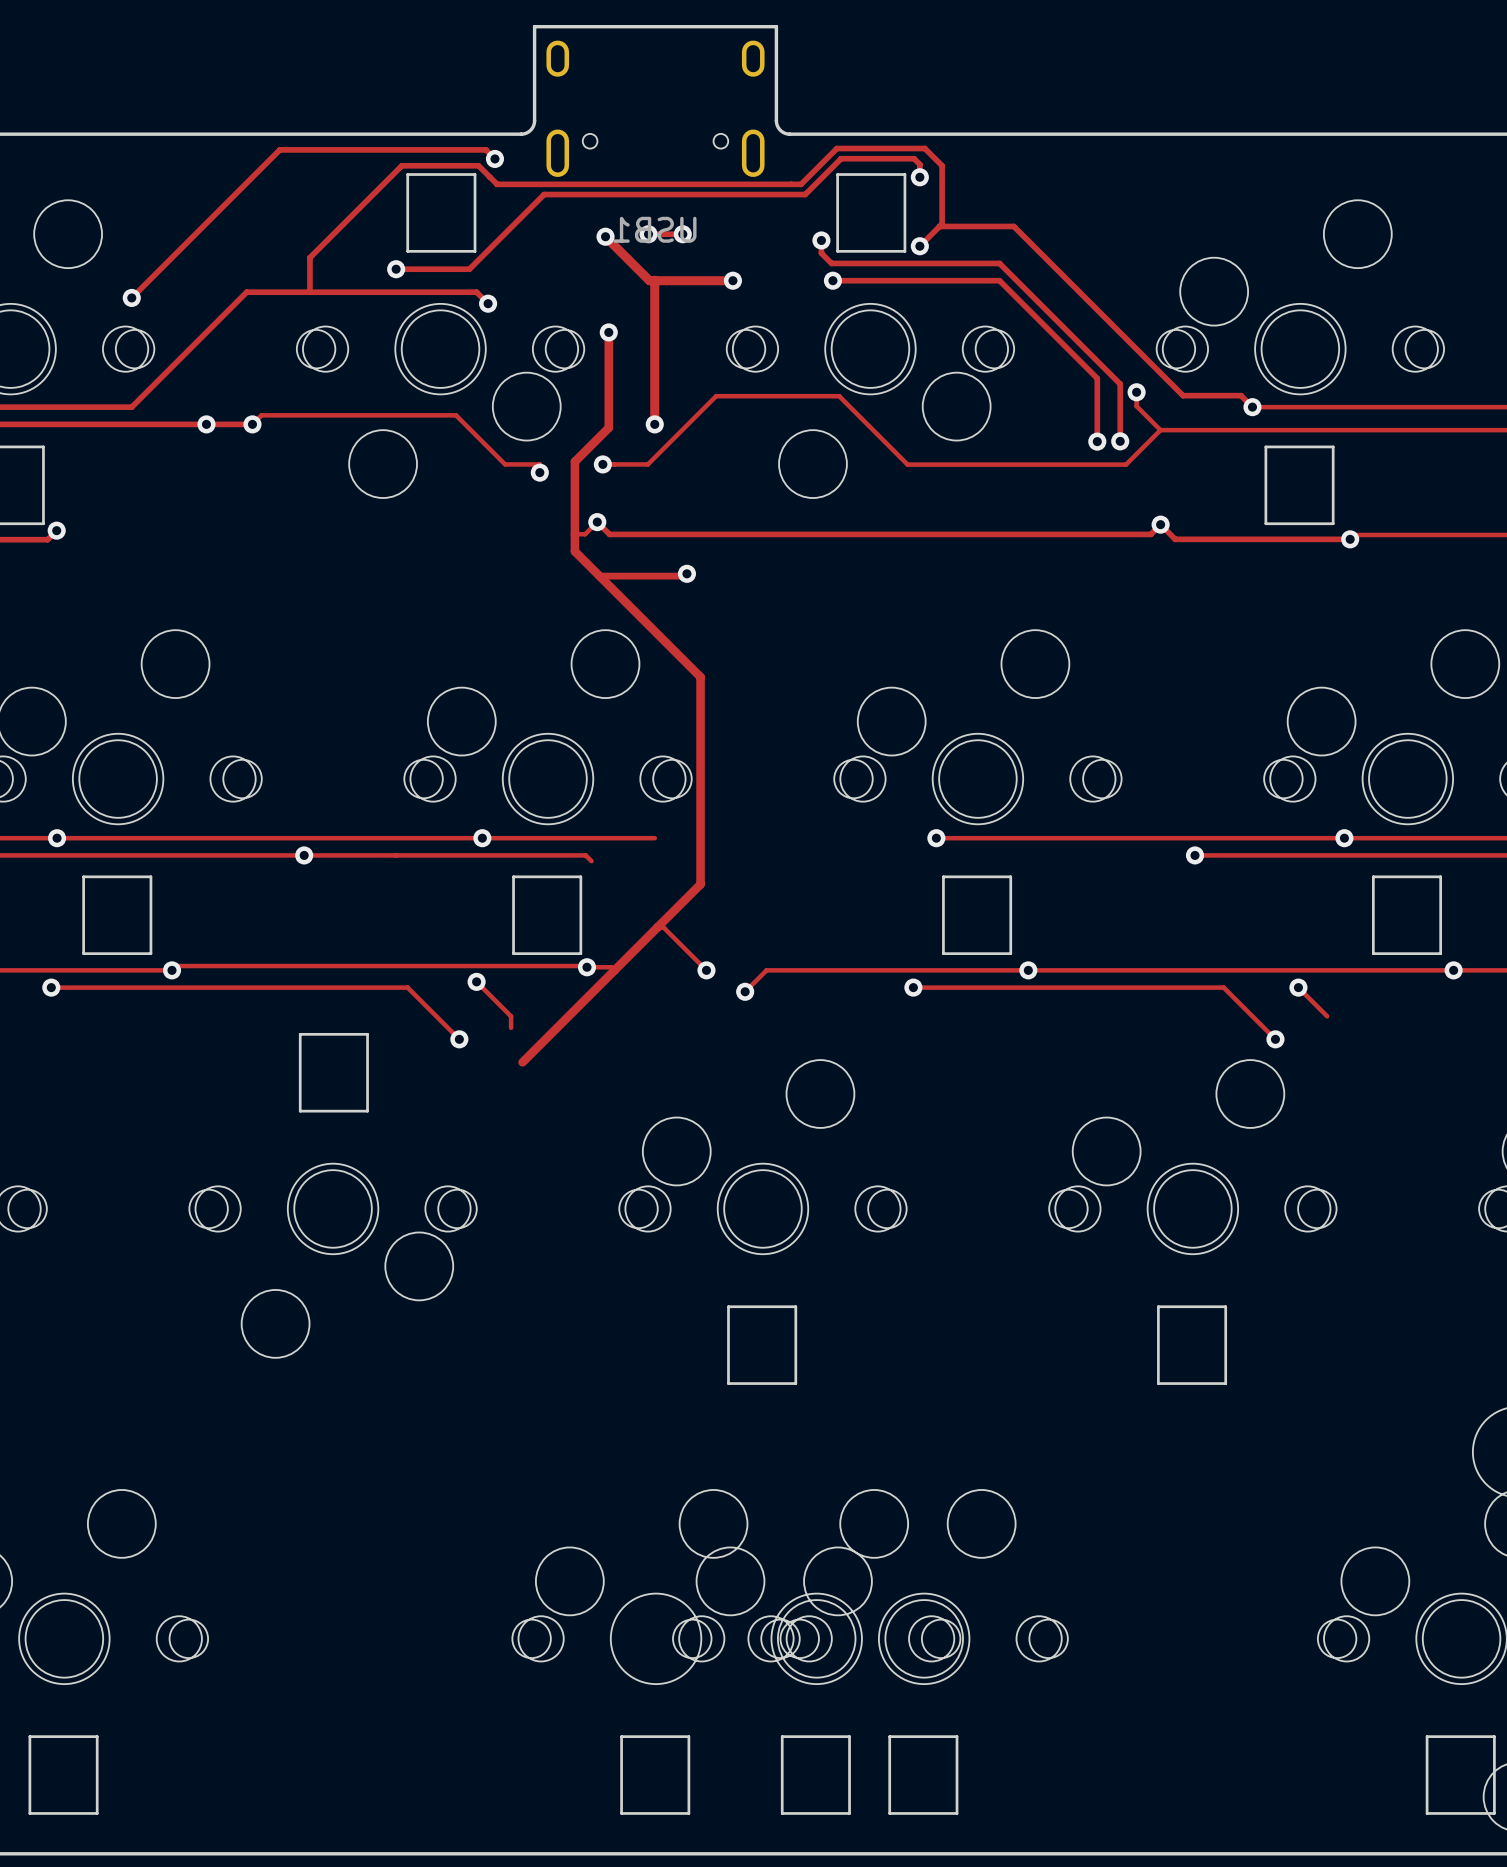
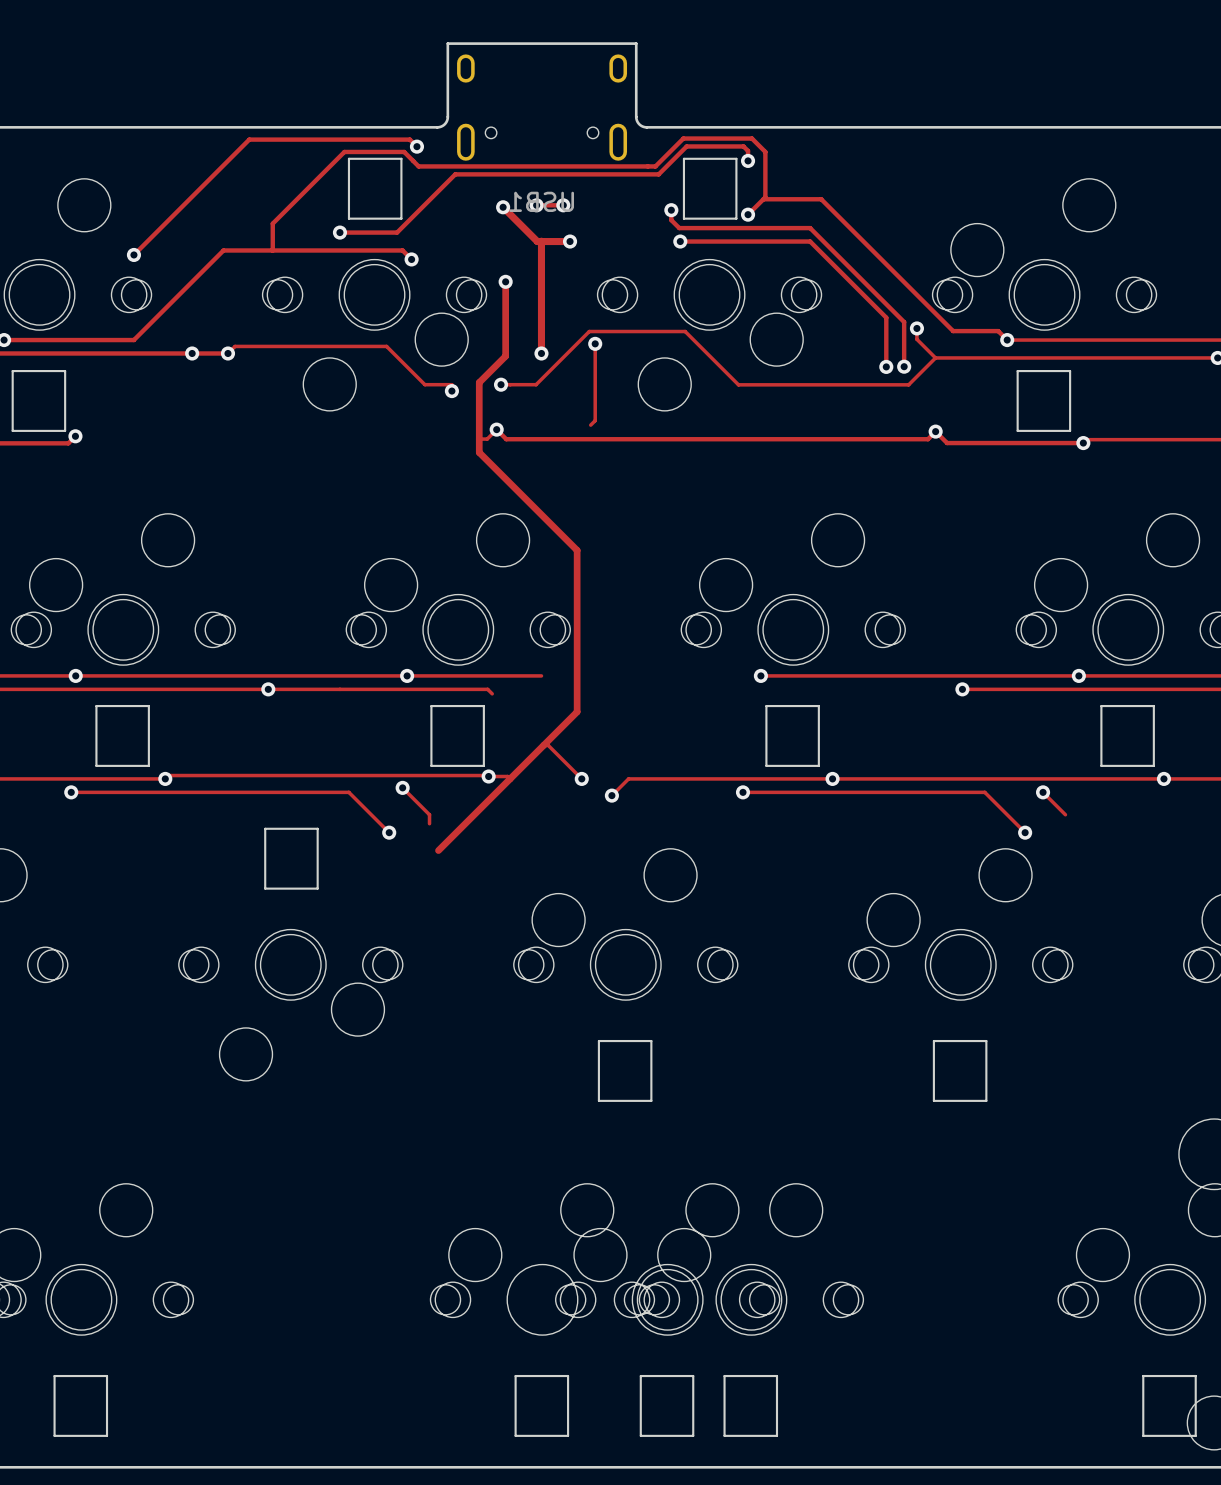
track: (691, 280) (732, 280) -> none
via position: (732, 280) -> (570, 241)
track: none -> (595, 343) (595, 420) (590, 425)
via: none -> (595, 343)
track: (686, 573) (684, 576) (599, 576) -> none
via: (686, 573) -> none

